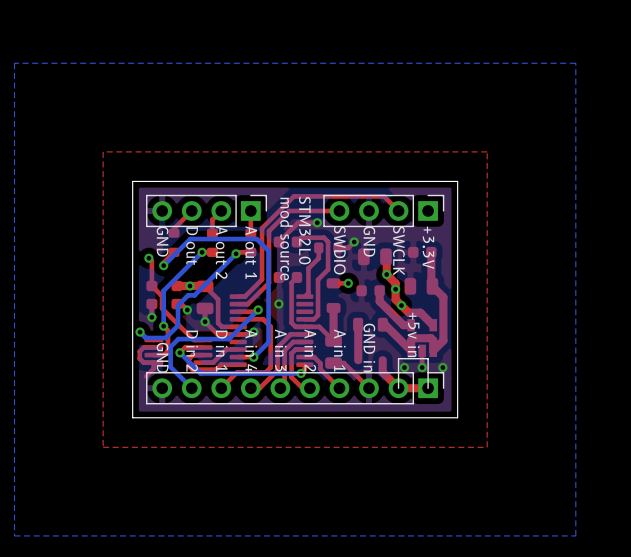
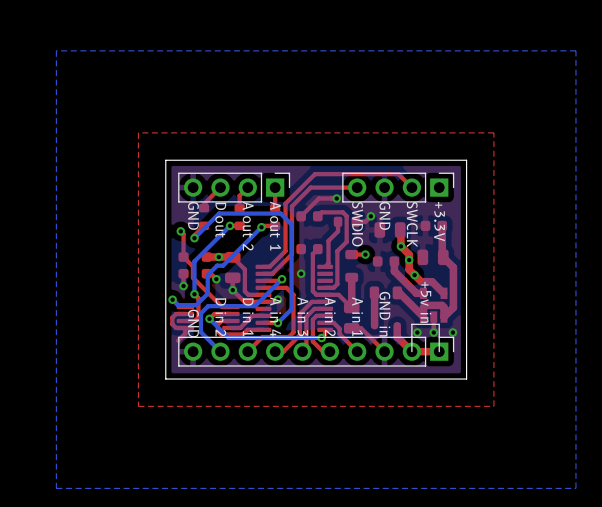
text: STM32L0 (304, 230) -> none
text: mod source (286, 239) -> none

